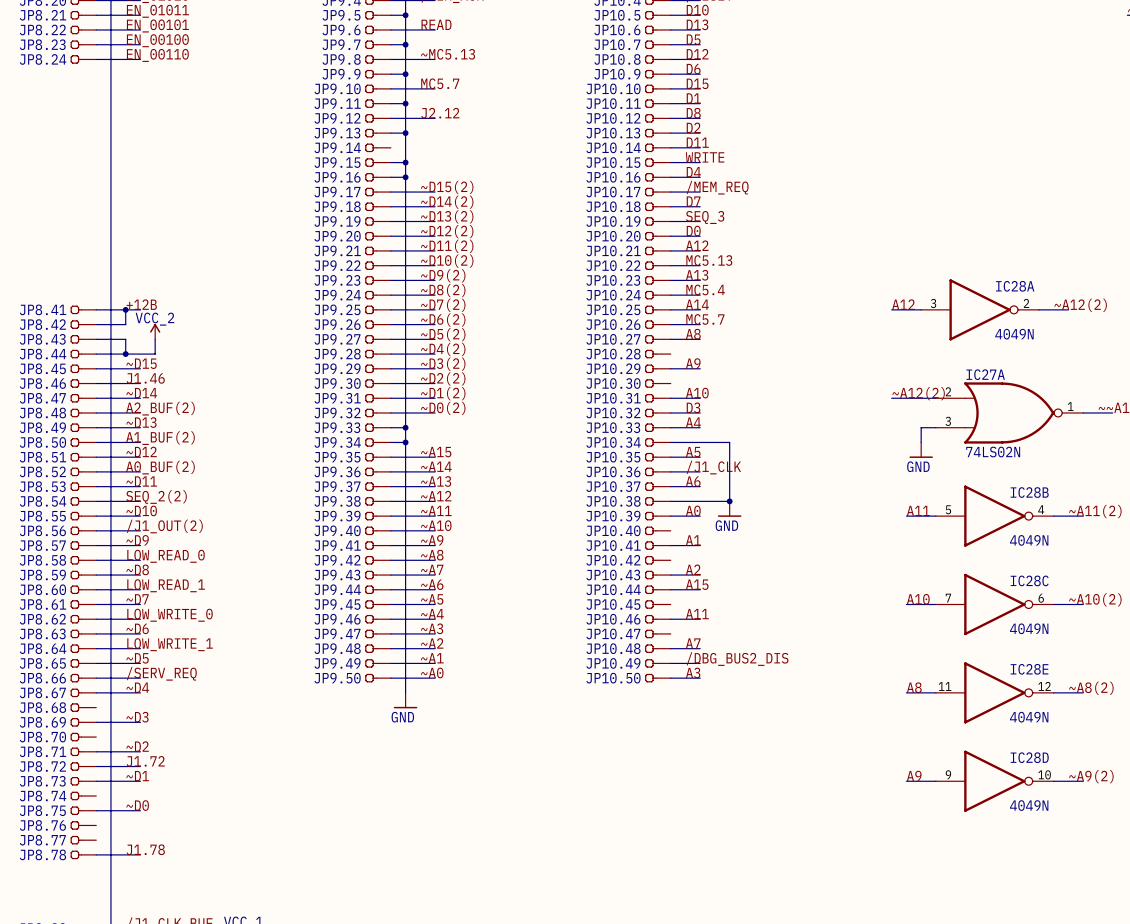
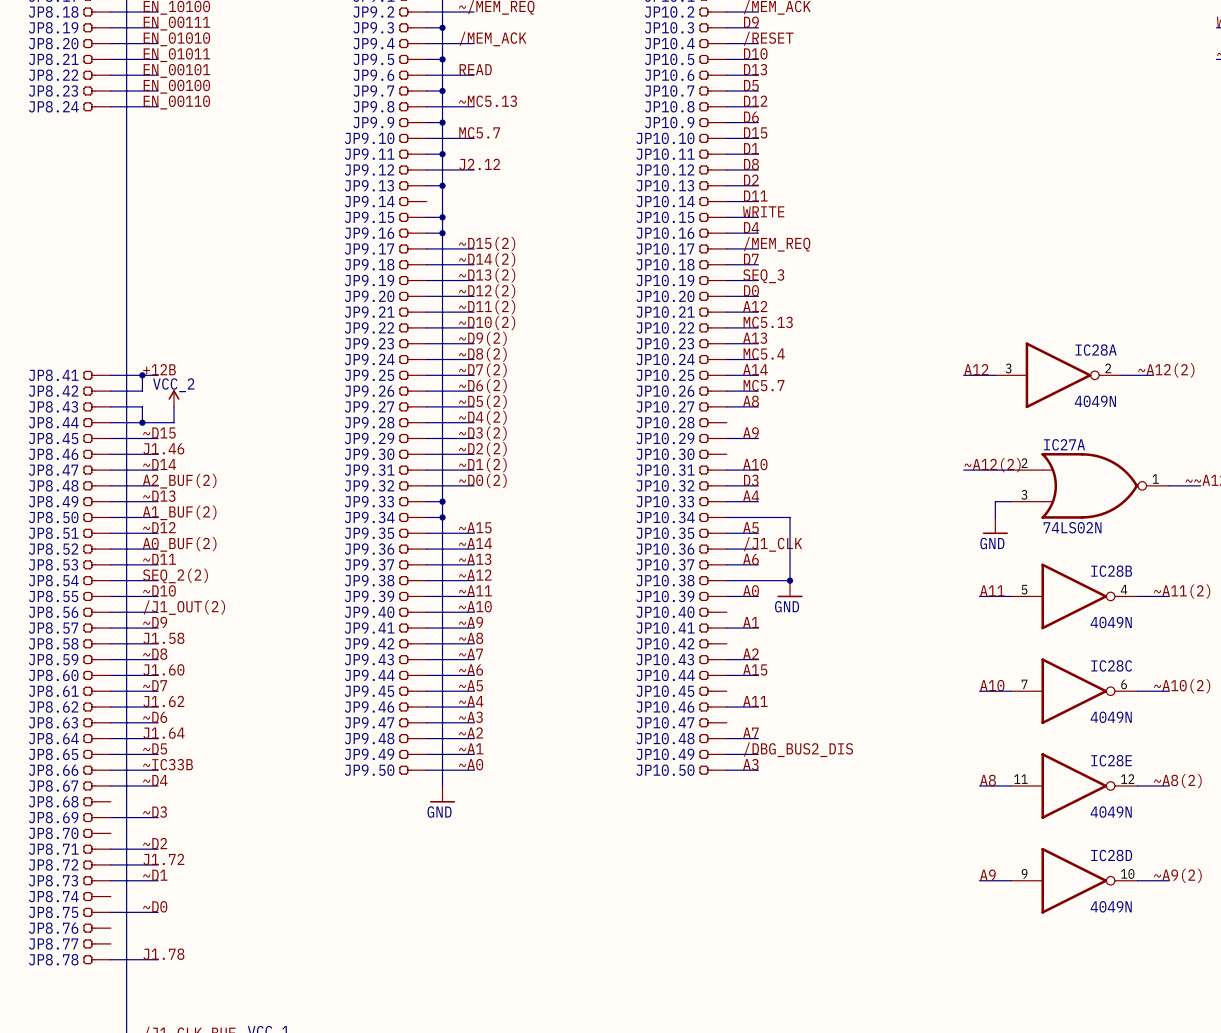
label: LOW_READ_0 (166, 556) -> J1.58 (163, 638)
label: LOW_READ_1 (166, 585) -> J1.60 (163, 669)
label: LOW_WRITE_0 (170, 615) -> J1.62 (163, 701)
label: LOW_WRITE_1 (170, 644) -> J1.64 (164, 733)
label: /SERV_REQ (161, 673) -> ~IC33B (168, 764)

